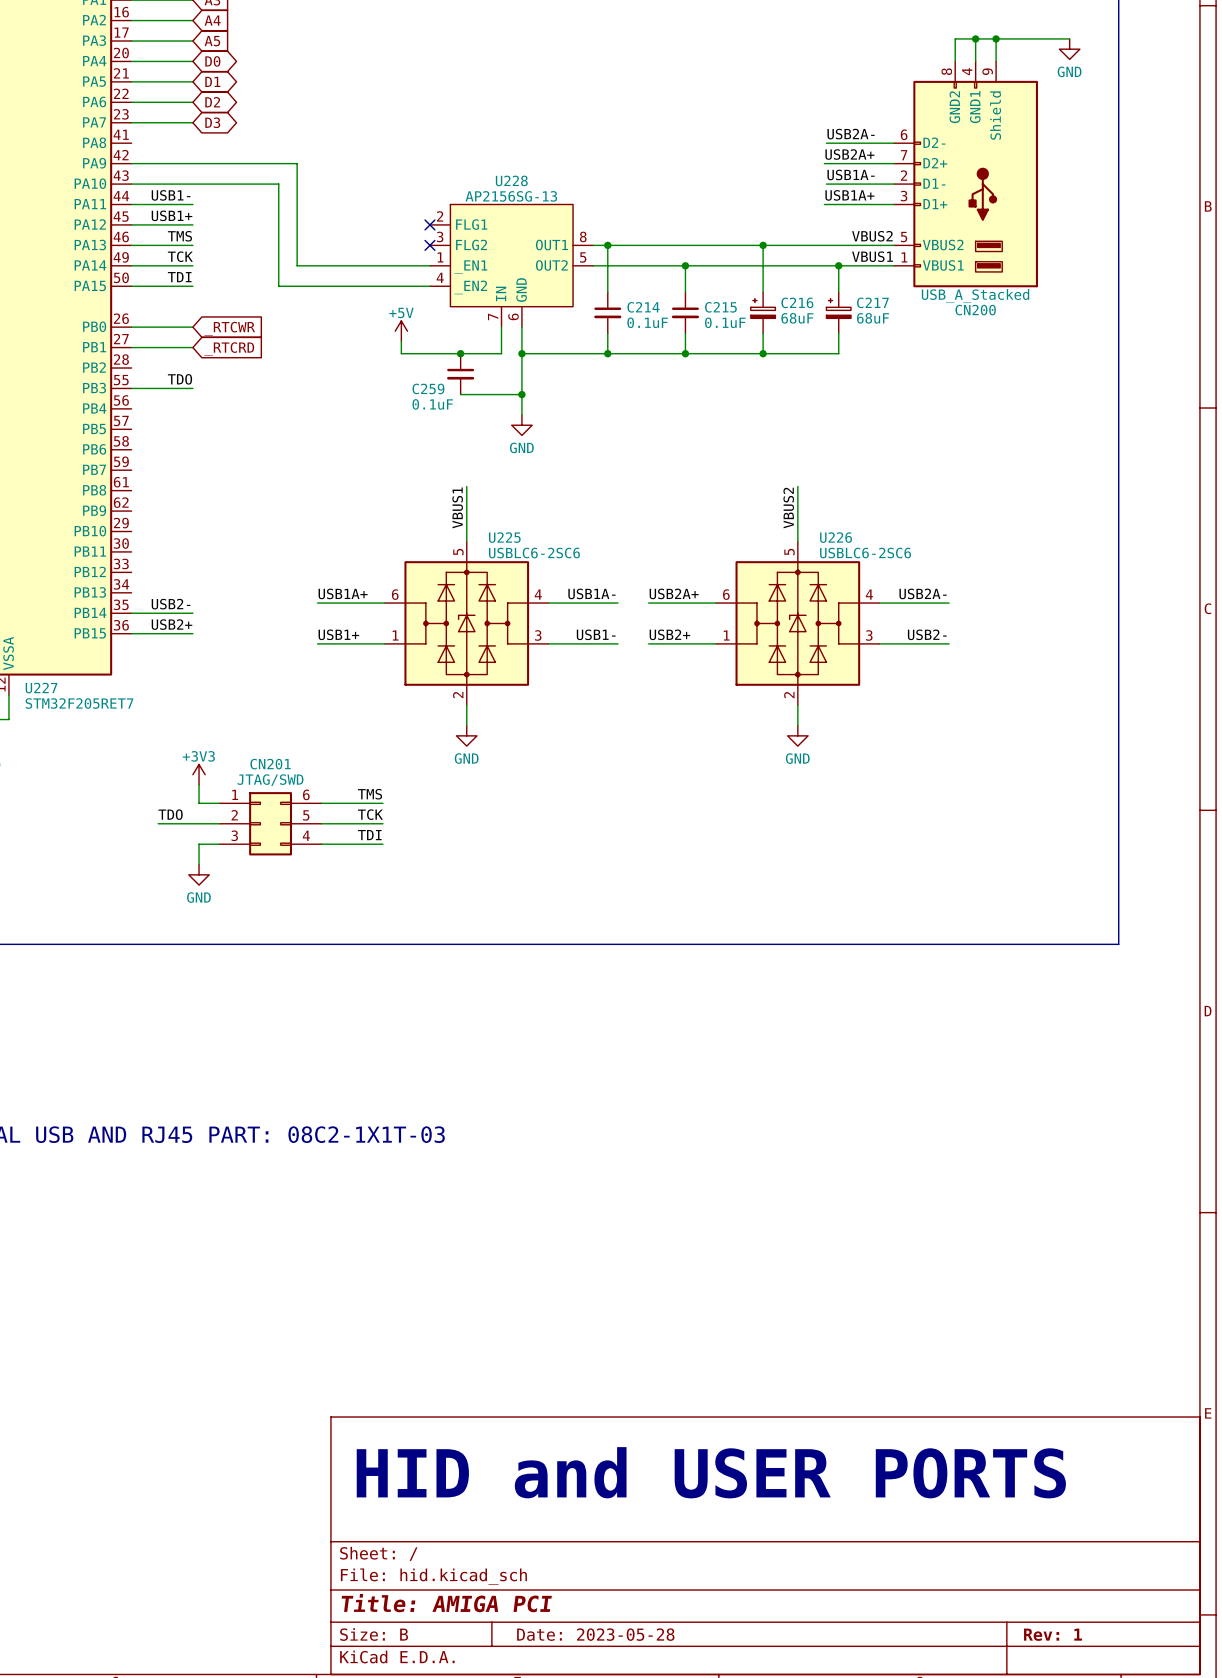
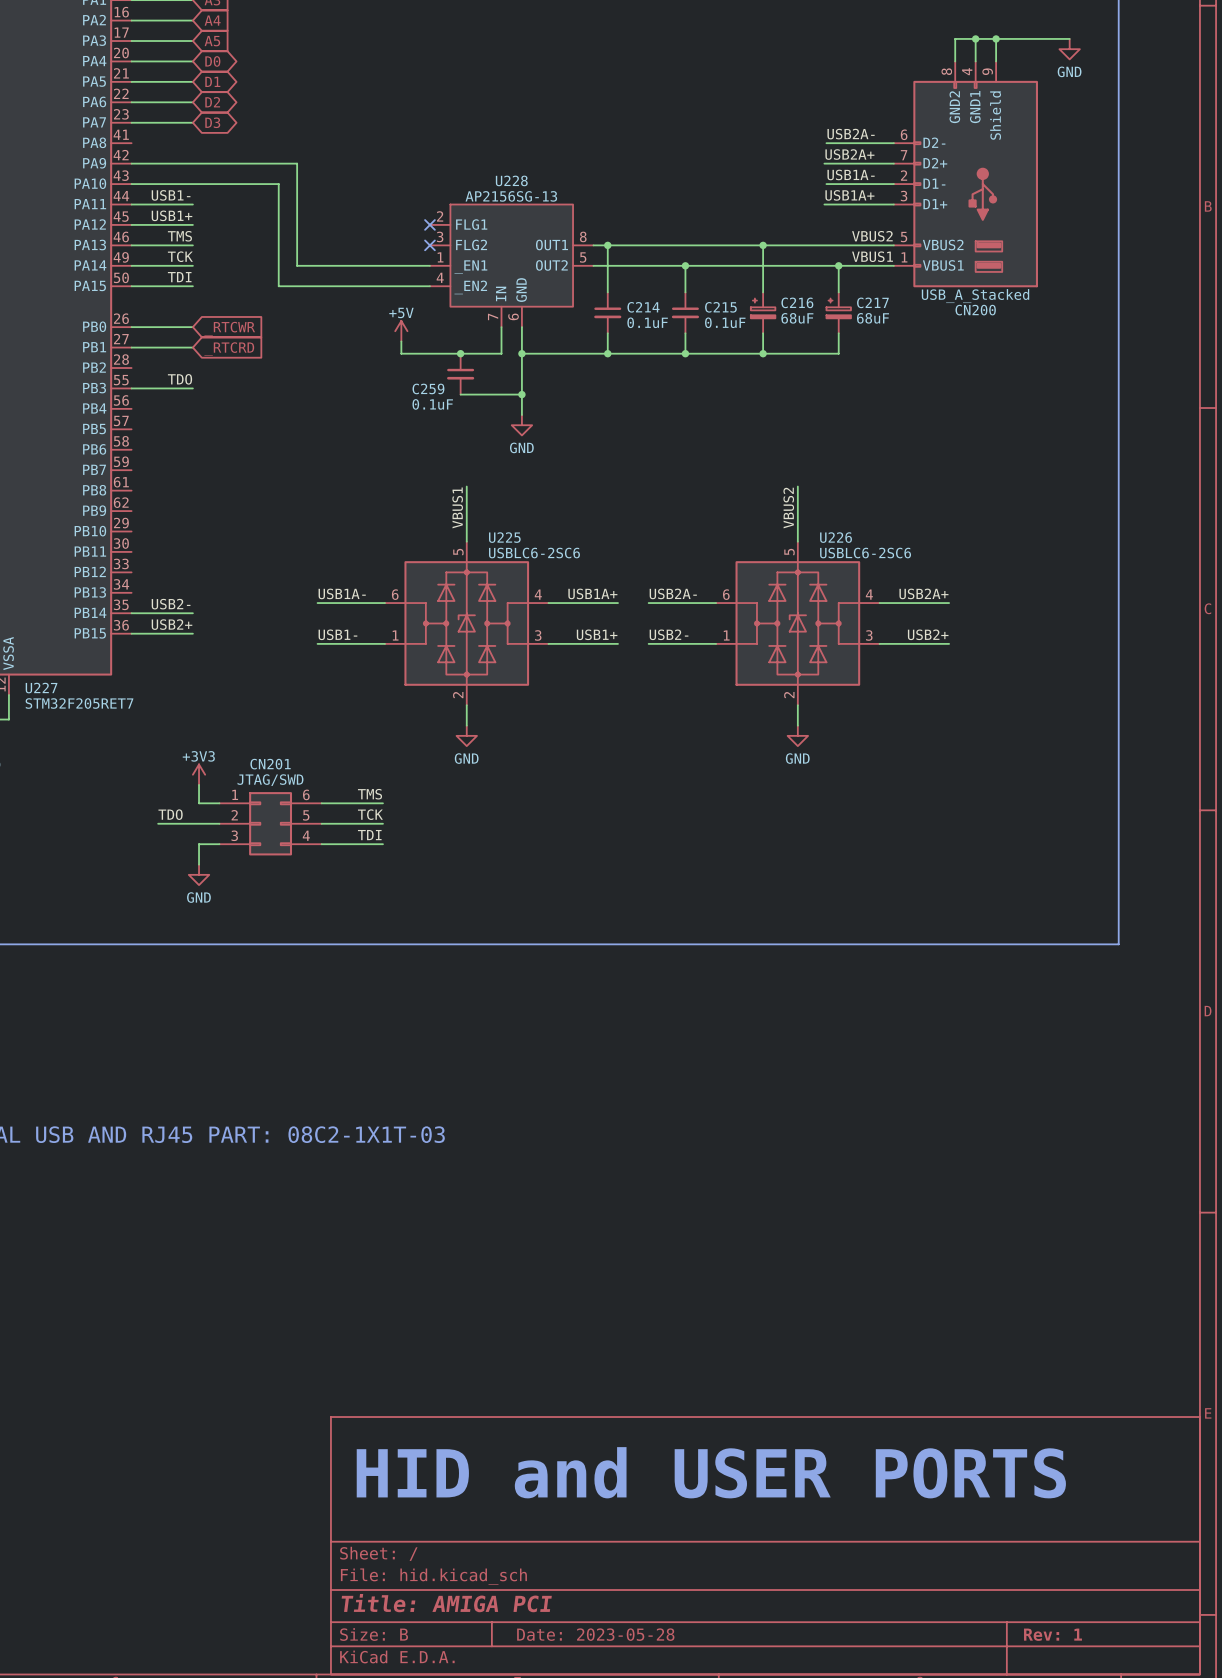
label: USB1A+ (343, 593) -> USB1A- (342, 593)
label: USB1A- (591, 593) -> USB1A+ (592, 593)
label: USB2A+ (674, 593) -> USB2A- (673, 593)
label: USB2A- (923, 593) -> USB2A+ (923, 593)
label: USB1+ (338, 634) -> USB1- (337, 634)
label: USB1- (596, 634) -> USB1+ (597, 634)
label: USB2+ (669, 634) -> USB2- (669, 634)
label: USB2- (927, 634) -> USB2+ (928, 634)

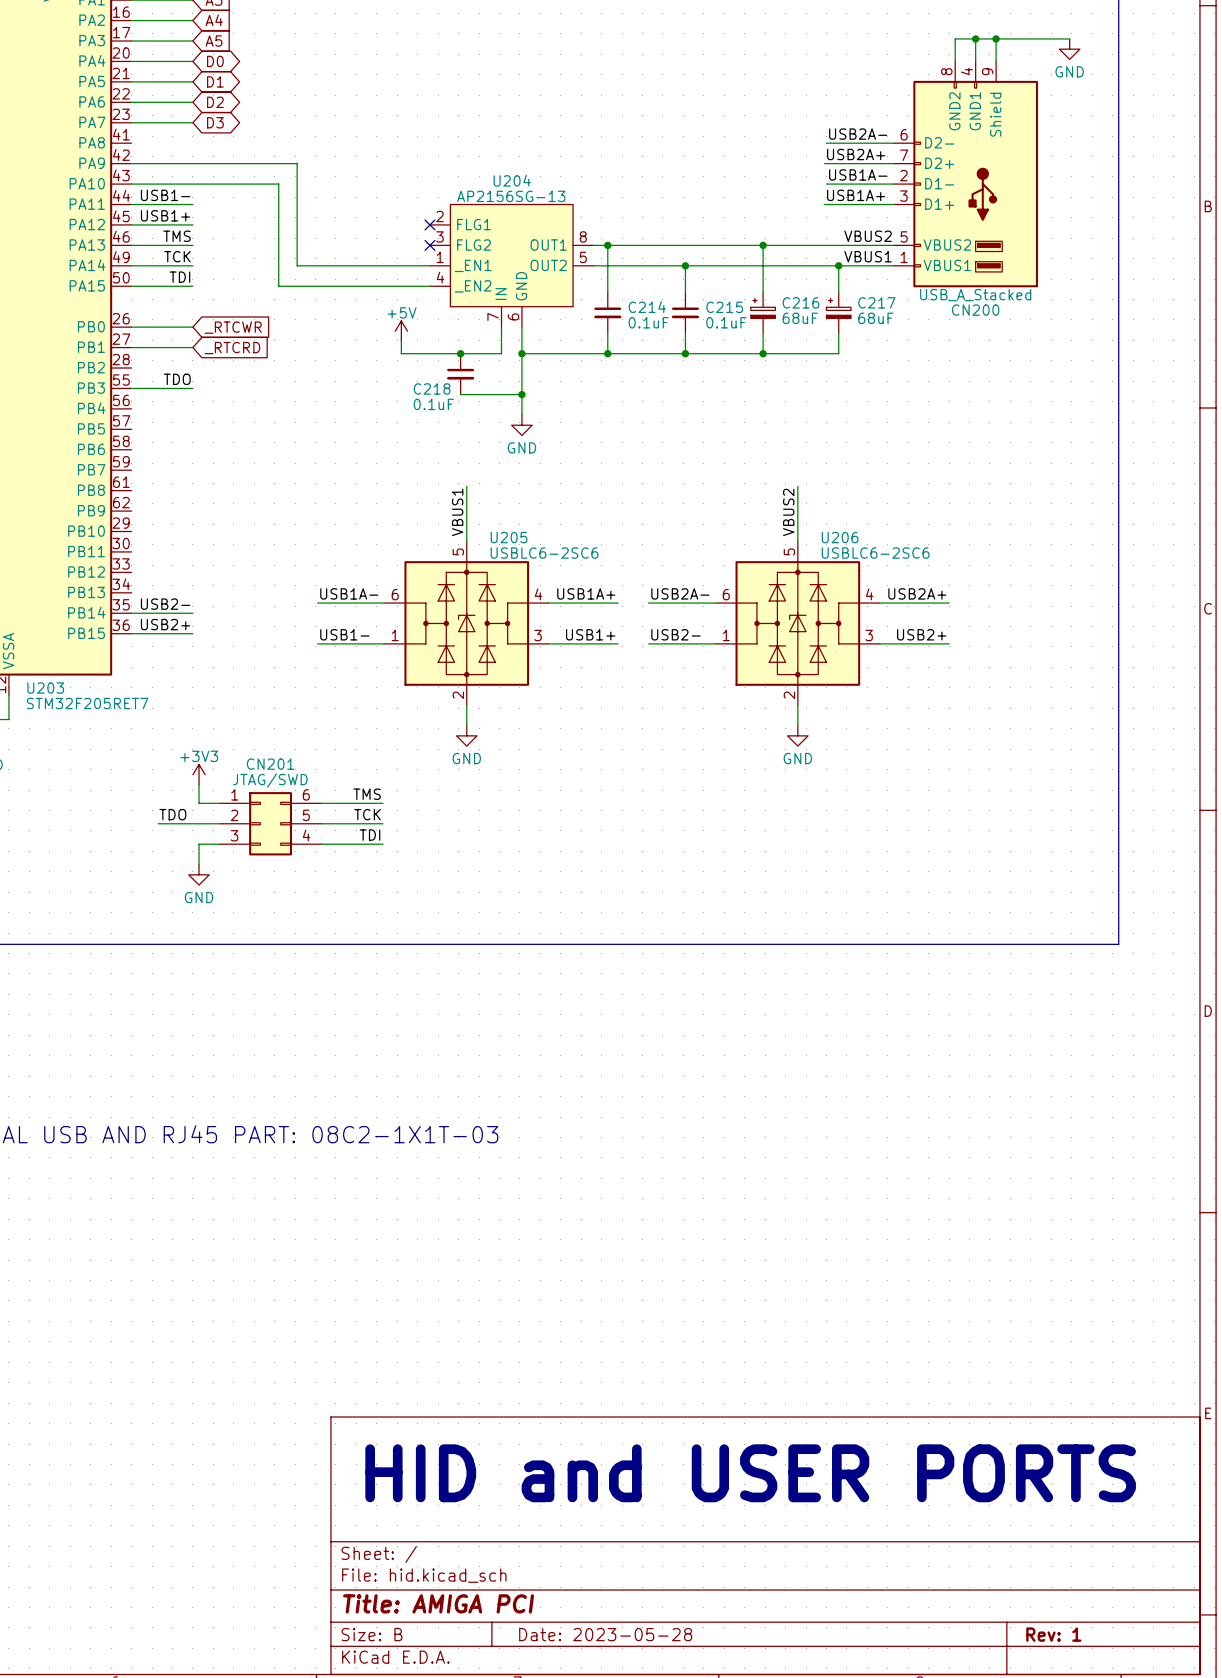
U228 name: U228 (511, 180) -> U204 (512, 180)
C259 name: C259 (428, 388) -> C218 (432, 388)
U225 name: U225 (504, 537) -> U205 (509, 537)
U226 name: U226 (836, 537) -> U206 (840, 537)
U227 name: U227 (41, 688) -> U203 (45, 688)

